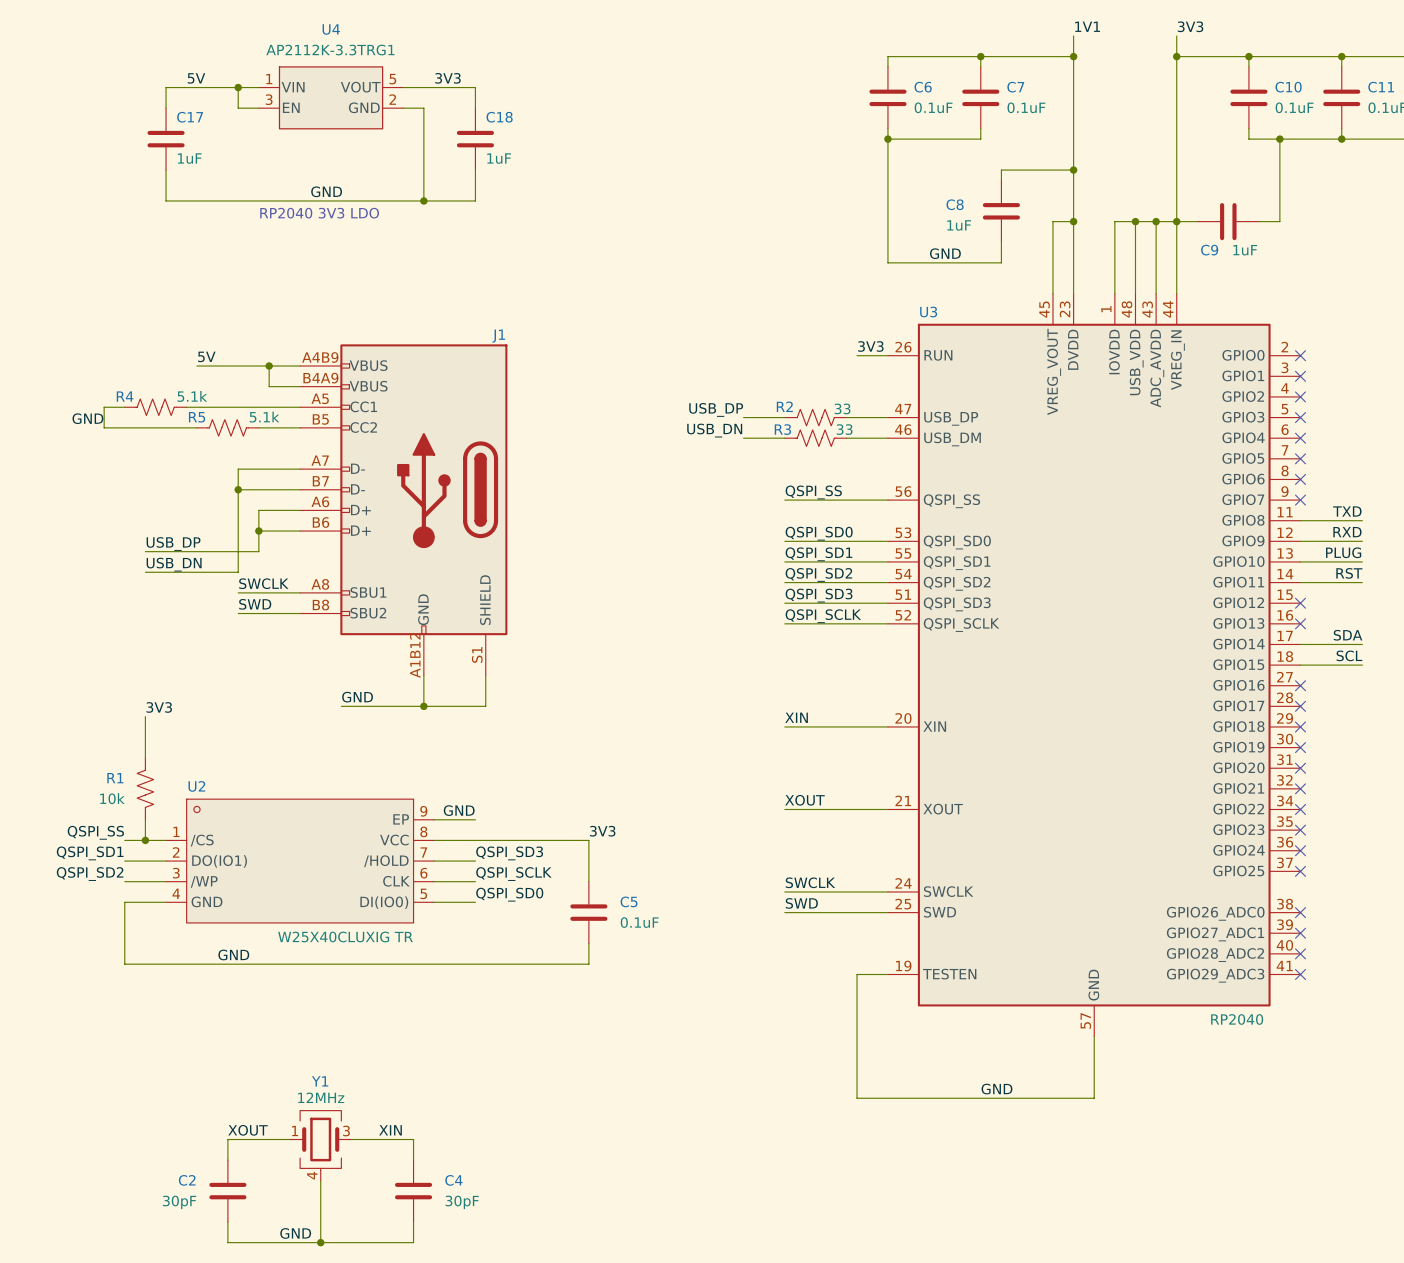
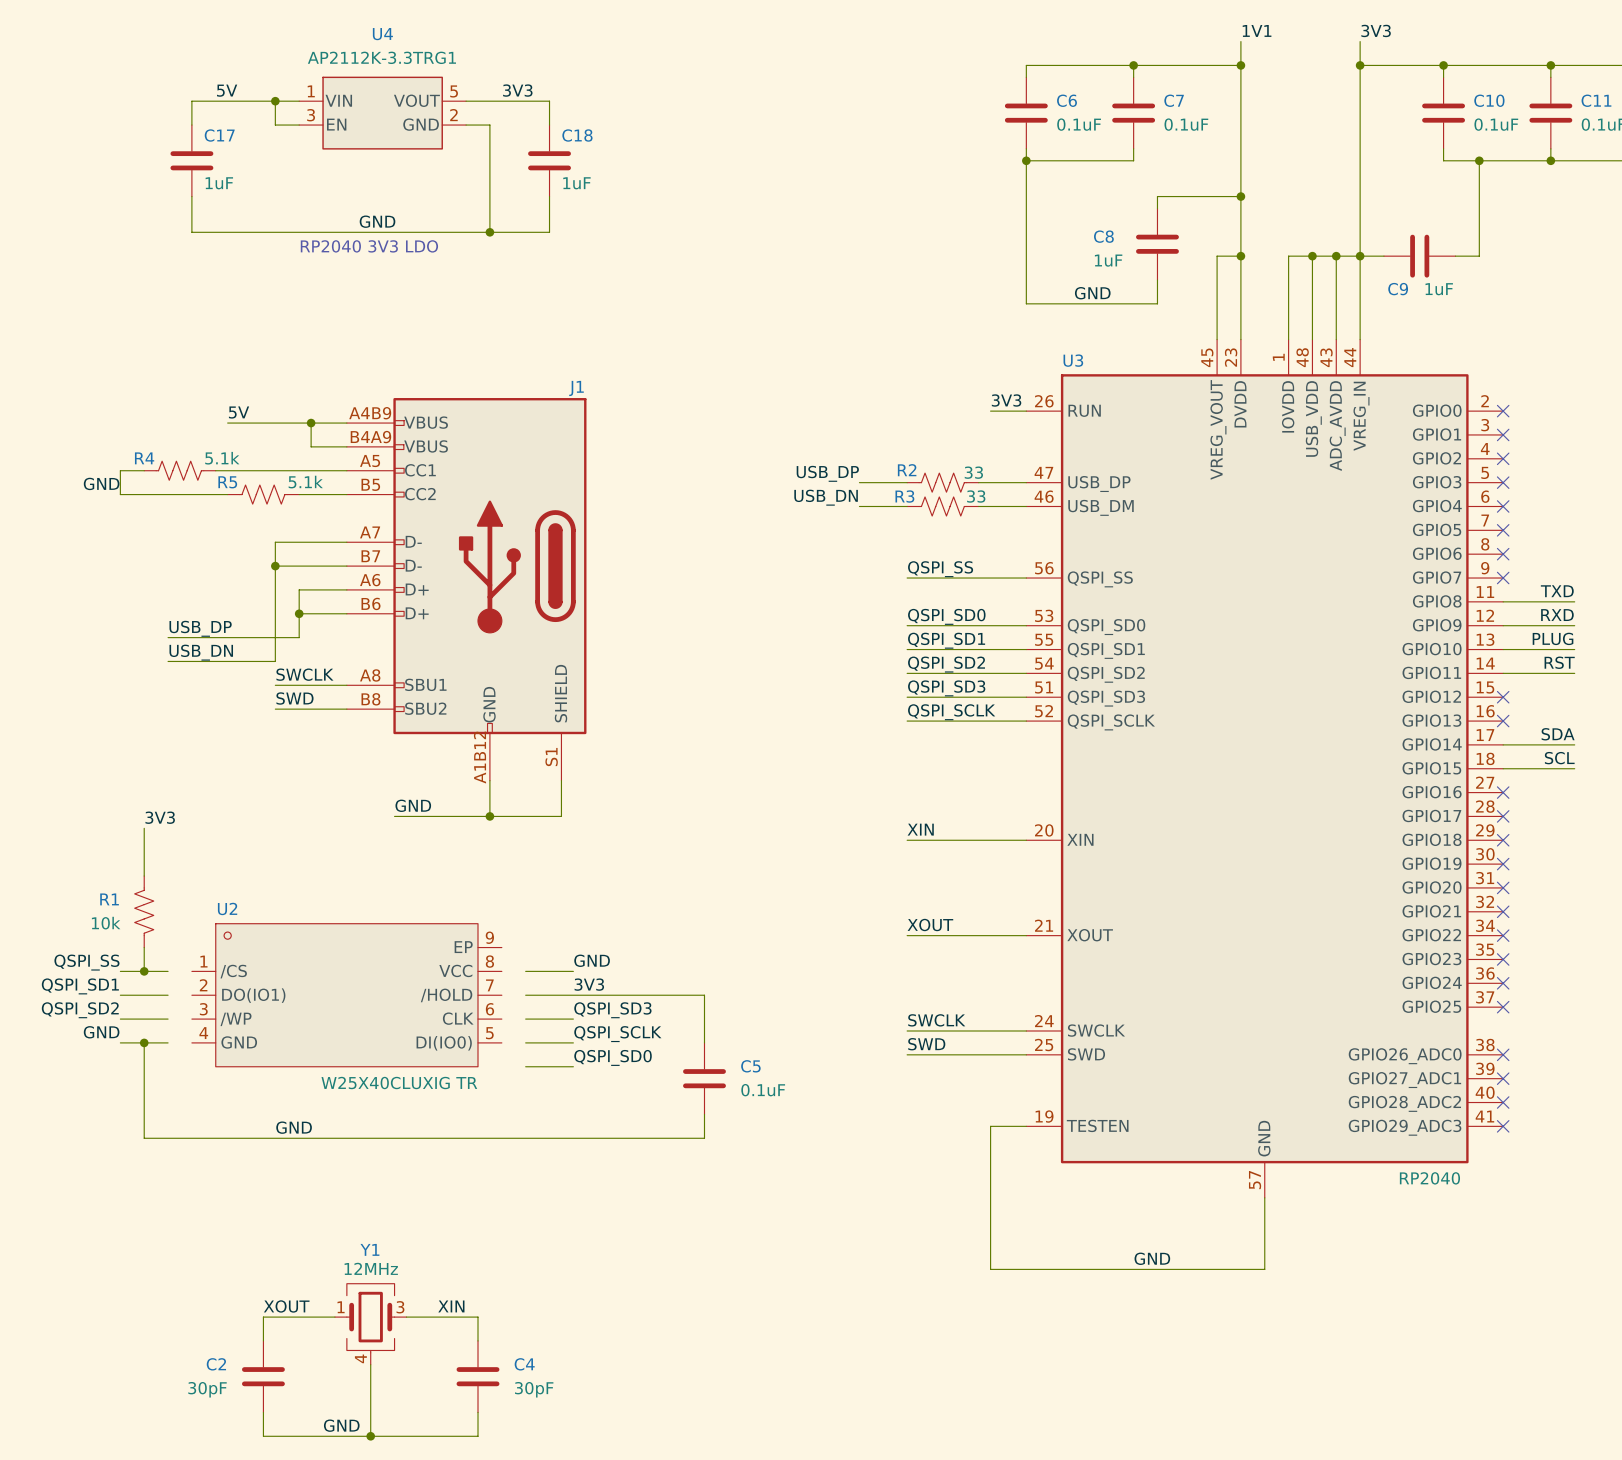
label position: 3V3 (159, 707) -> 3V3 (160, 817)
wire: (145, 716) (145, 757) -> (144, 828) (144, 876)
R1 position: (145, 788) -> (144, 911)
label position: GND (459, 810) -> GND (592, 960)
wire: none -> (144, 947) (144, 971) (120, 971)
wire: (145, 819) (145, 840) (166, 840) -> none
wire: (434, 819) (475, 819) -> (525, 1066) (573, 1066)
label position: 3V3 (602, 831) -> 3V3 (589, 984)
label position: QSPI_SS (95, 832) -> QSPI_SS (86, 962)
junction position: (145, 840) -> (144, 971)
wire: (434, 840) (454, 840) -> none
wire: (496, 840) (588, 840) (588, 881) -> none
label position: QSPI_SD1 (90, 853) -> QSPI_SD1 (80, 986)
label position: QSPI_SD3 (509, 853) -> QSPI_SD3 (612, 1010)
wire: (145, 861) (166, 861) -> (120, 995) (144, 995)
wire: (434, 861) (454, 861) -> none
wire: none -> (549, 995) (704, 995) (704, 1042)
label position: QSPI_SD2 (90, 874) -> QSPI_SD2 (80, 1010)
label position: QSPI_SCLK (513, 874) -> QSPI_SCLK (617, 1034)
wire: (145, 881) (166, 881) -> (120, 1019) (144, 1019)
wire: (434, 881) (454, 881) -> (549, 1019) (573, 1019)
label: none -> GND (101, 1032)
label position: QSPI_SD0 (509, 894) -> QSPI_SD0 (613, 1057)
junction: none -> (144, 1042)
wire: (145, 902) (166, 902) -> (120, 1042) (144, 1042)
wire: (434, 902) (454, 902) -> (549, 1042) (573, 1042)
C5 position: (588, 912) -> (704, 1078)
wire: (588, 943) (588, 964) (124, 964) -> (704, 1114) (704, 1138) (144, 1138) (144, 1114)
label position: GND (233, 954) -> GND (294, 1127)

